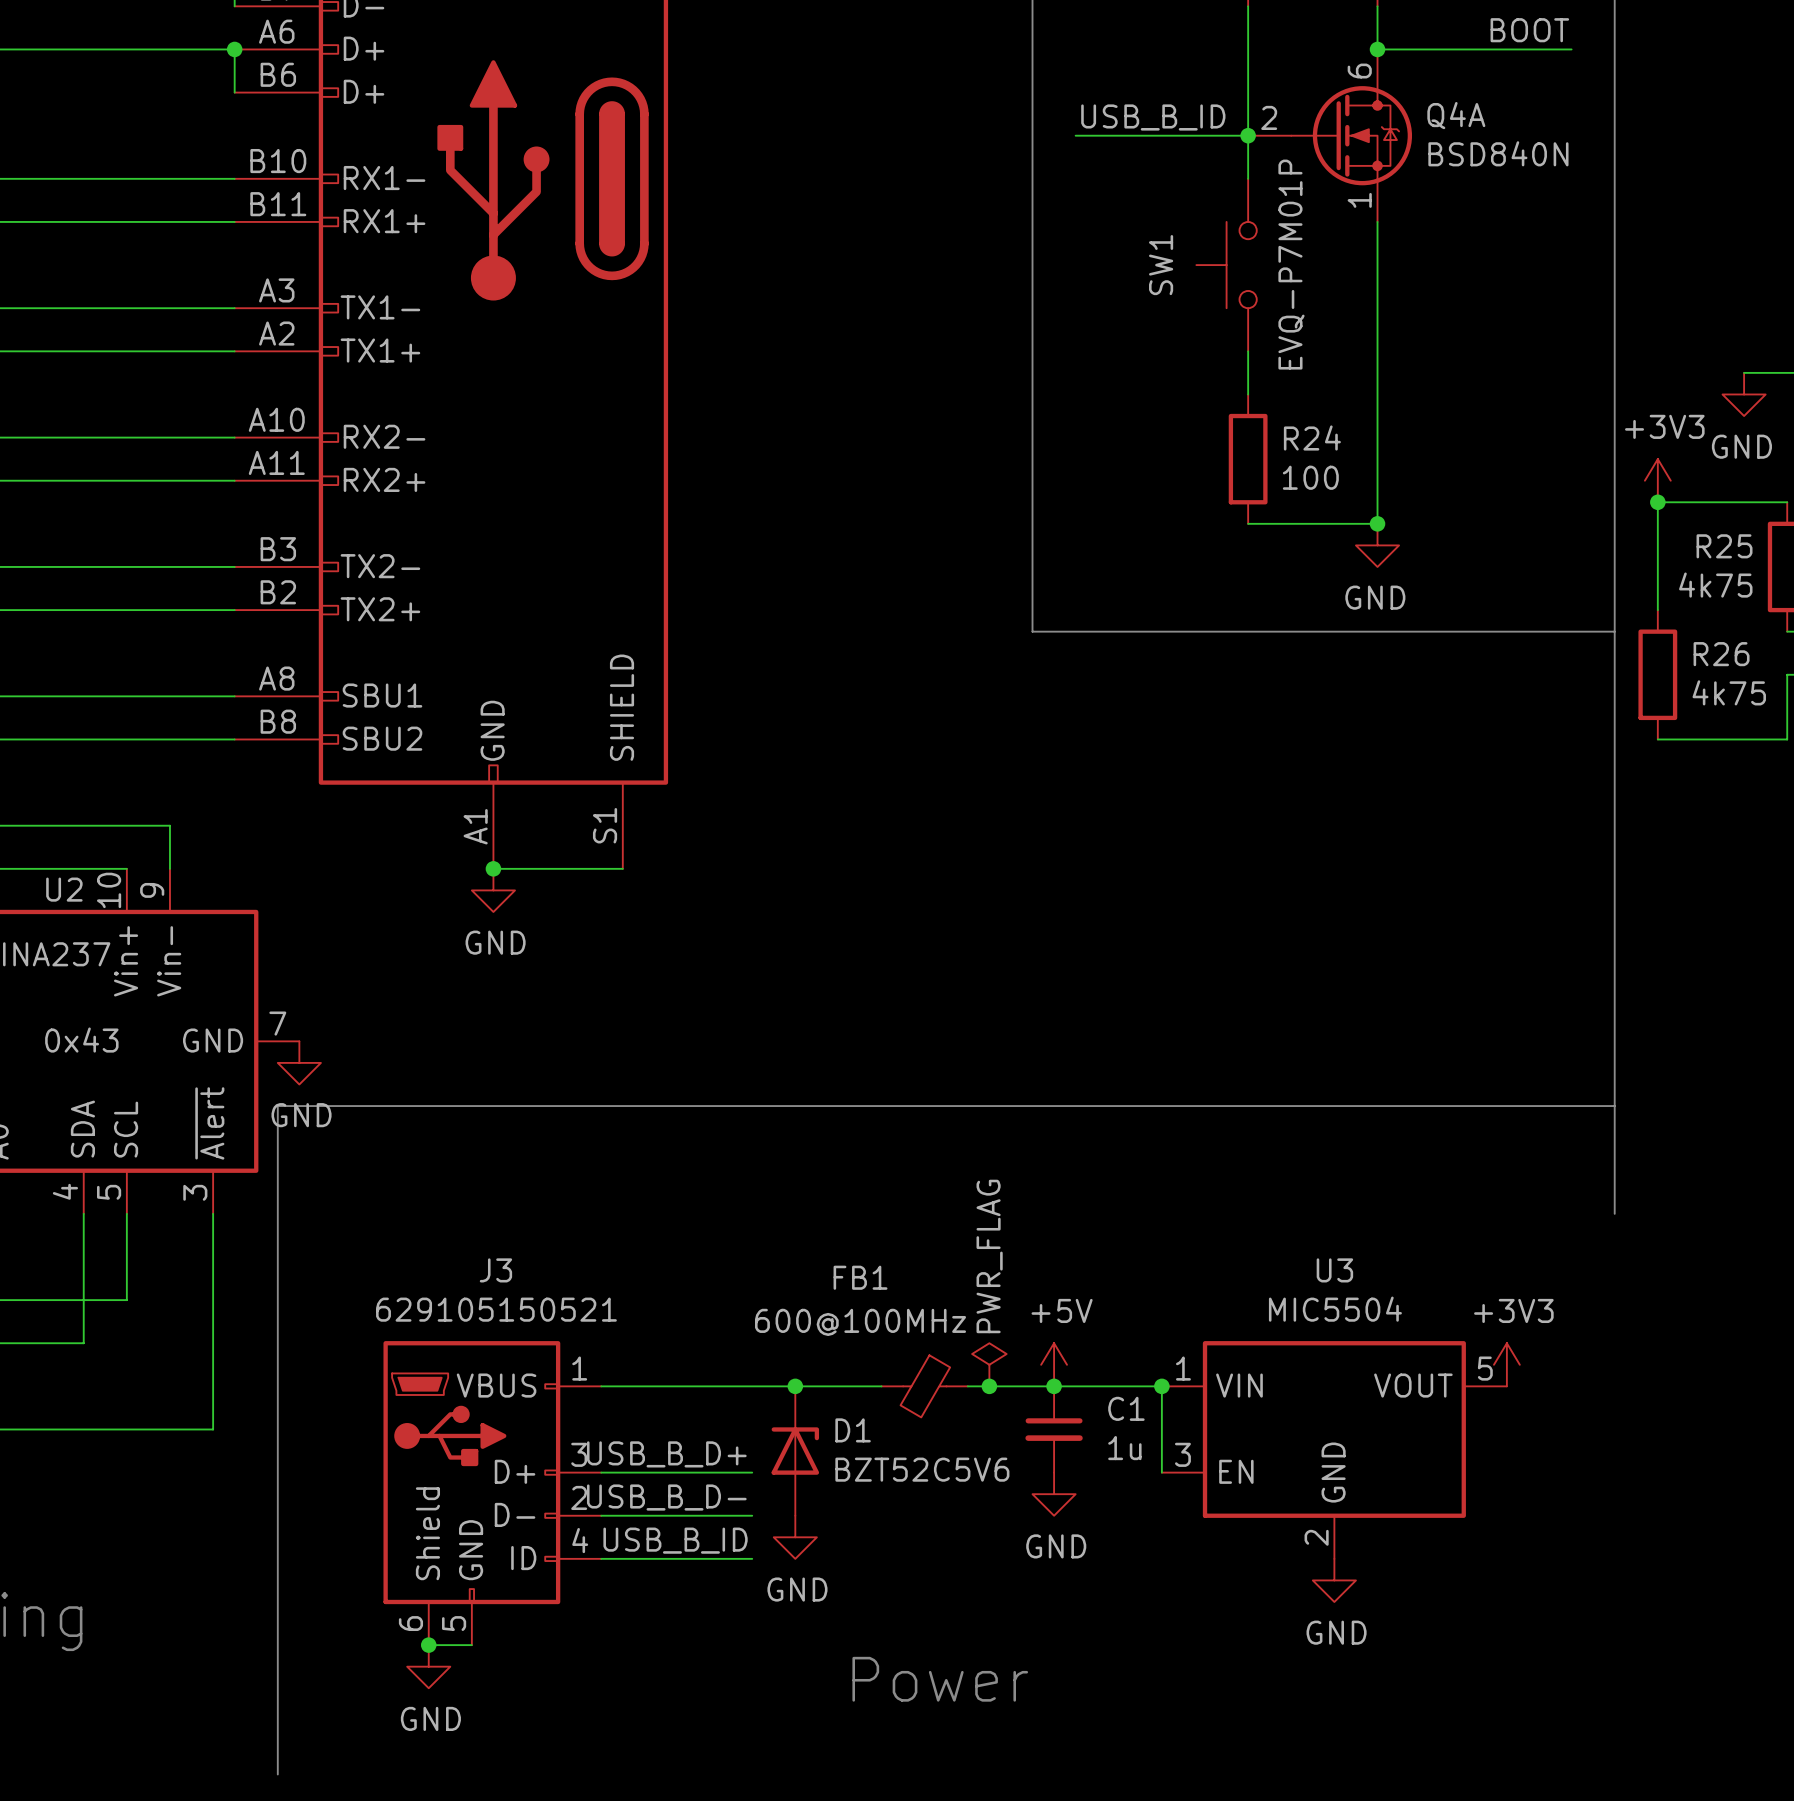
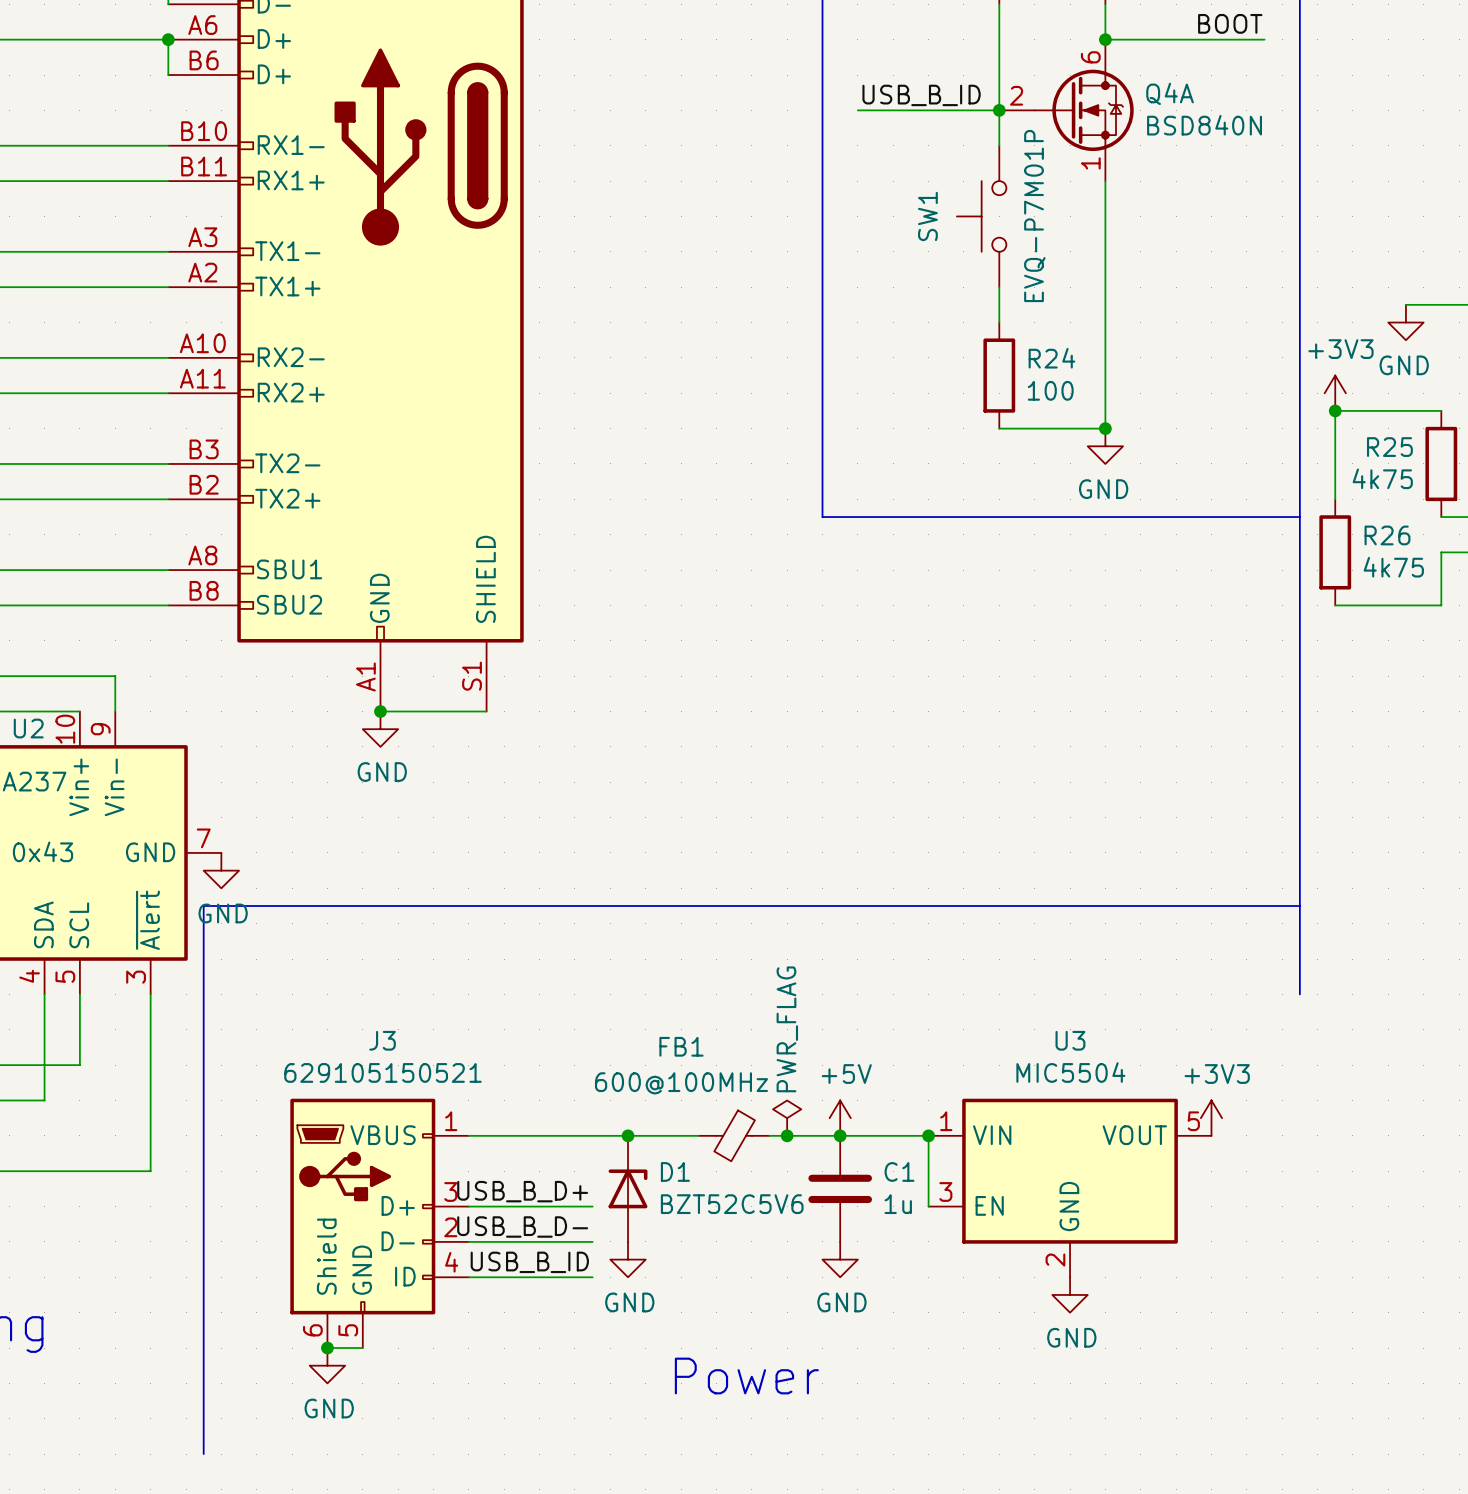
C1 symbol: [1025, 1386, 1083, 1473] -> [808, 1135, 873, 1242]
power symbol position: GND (1054, 1494) -> GND (840, 1259)

